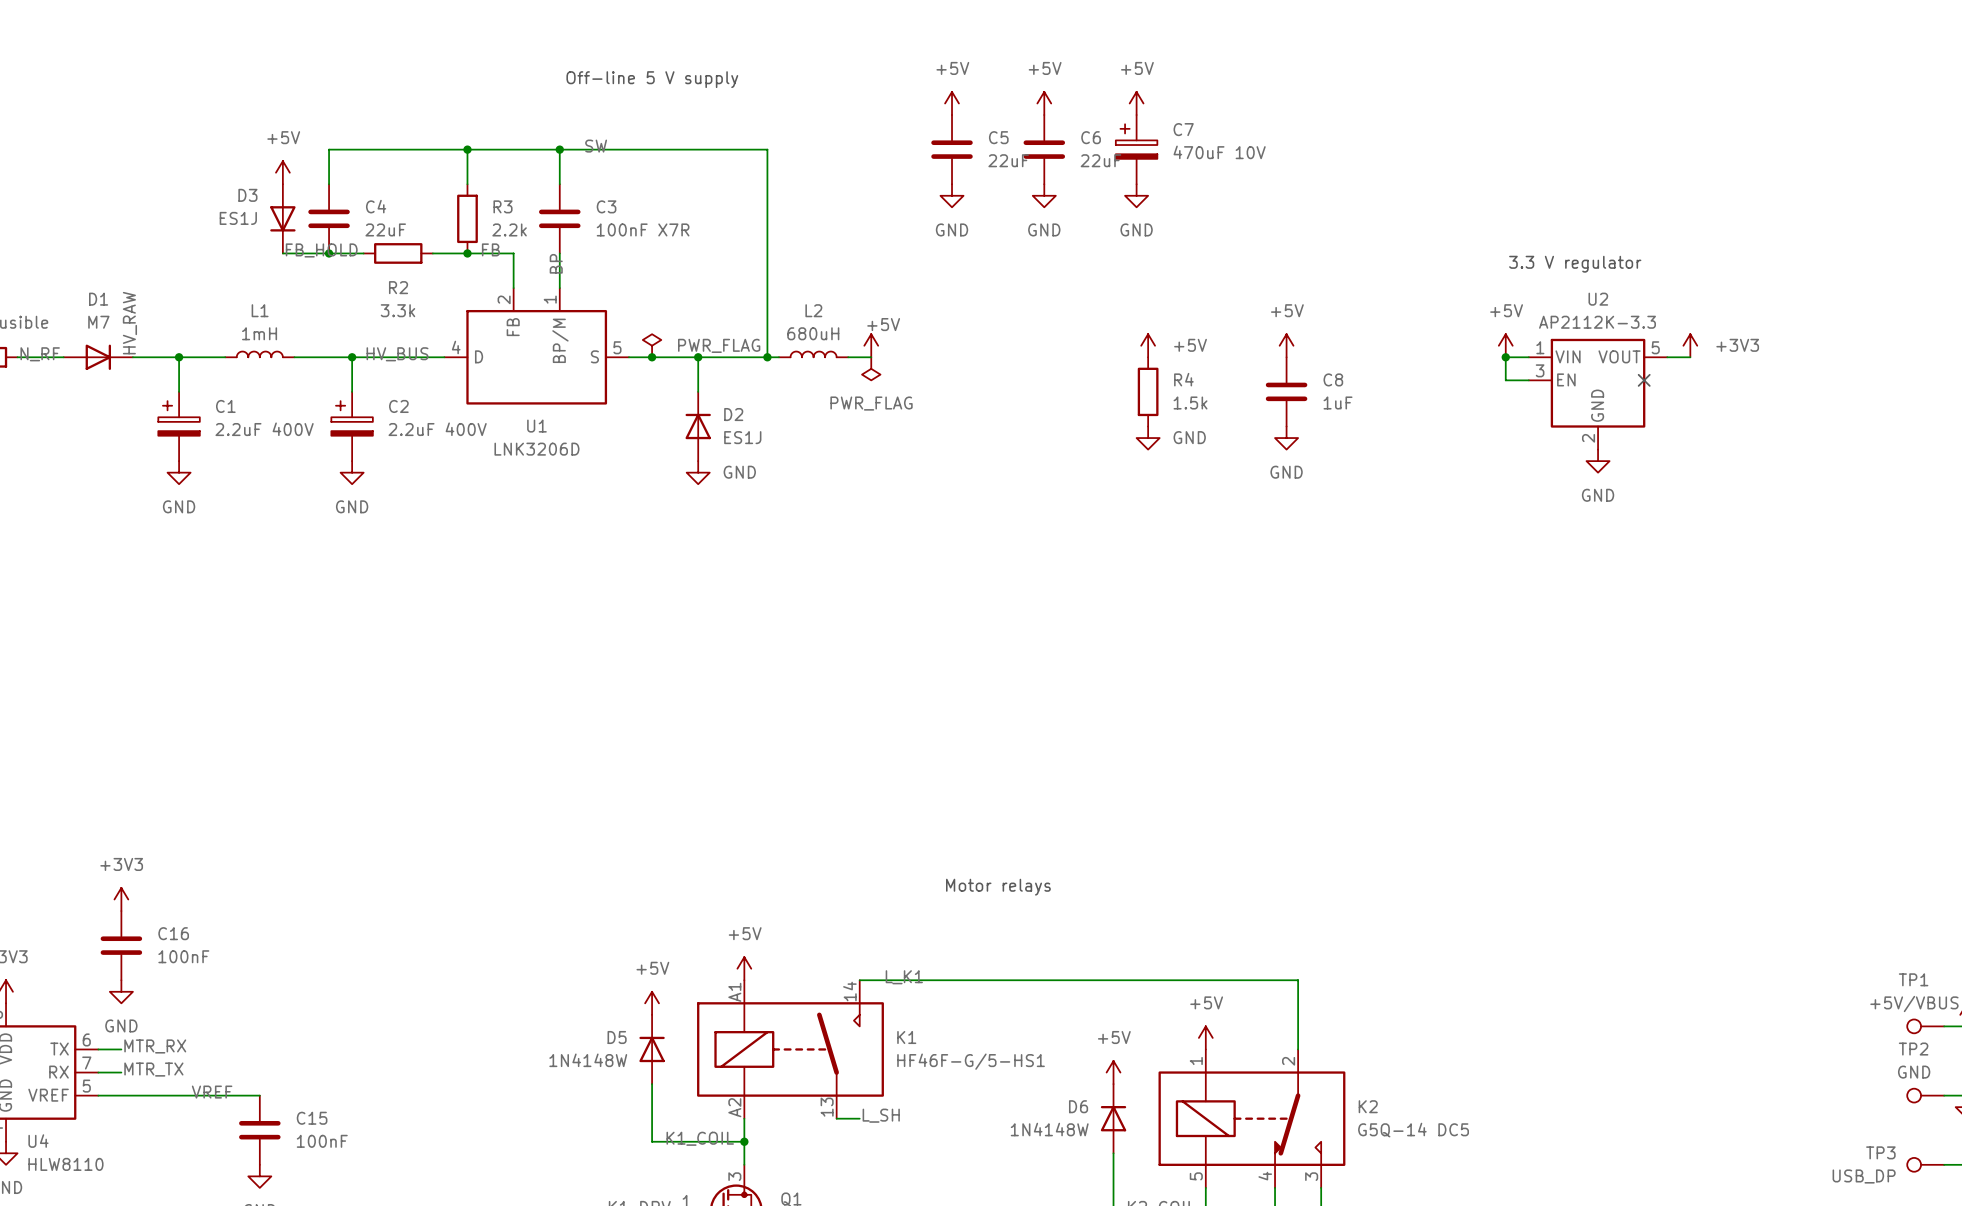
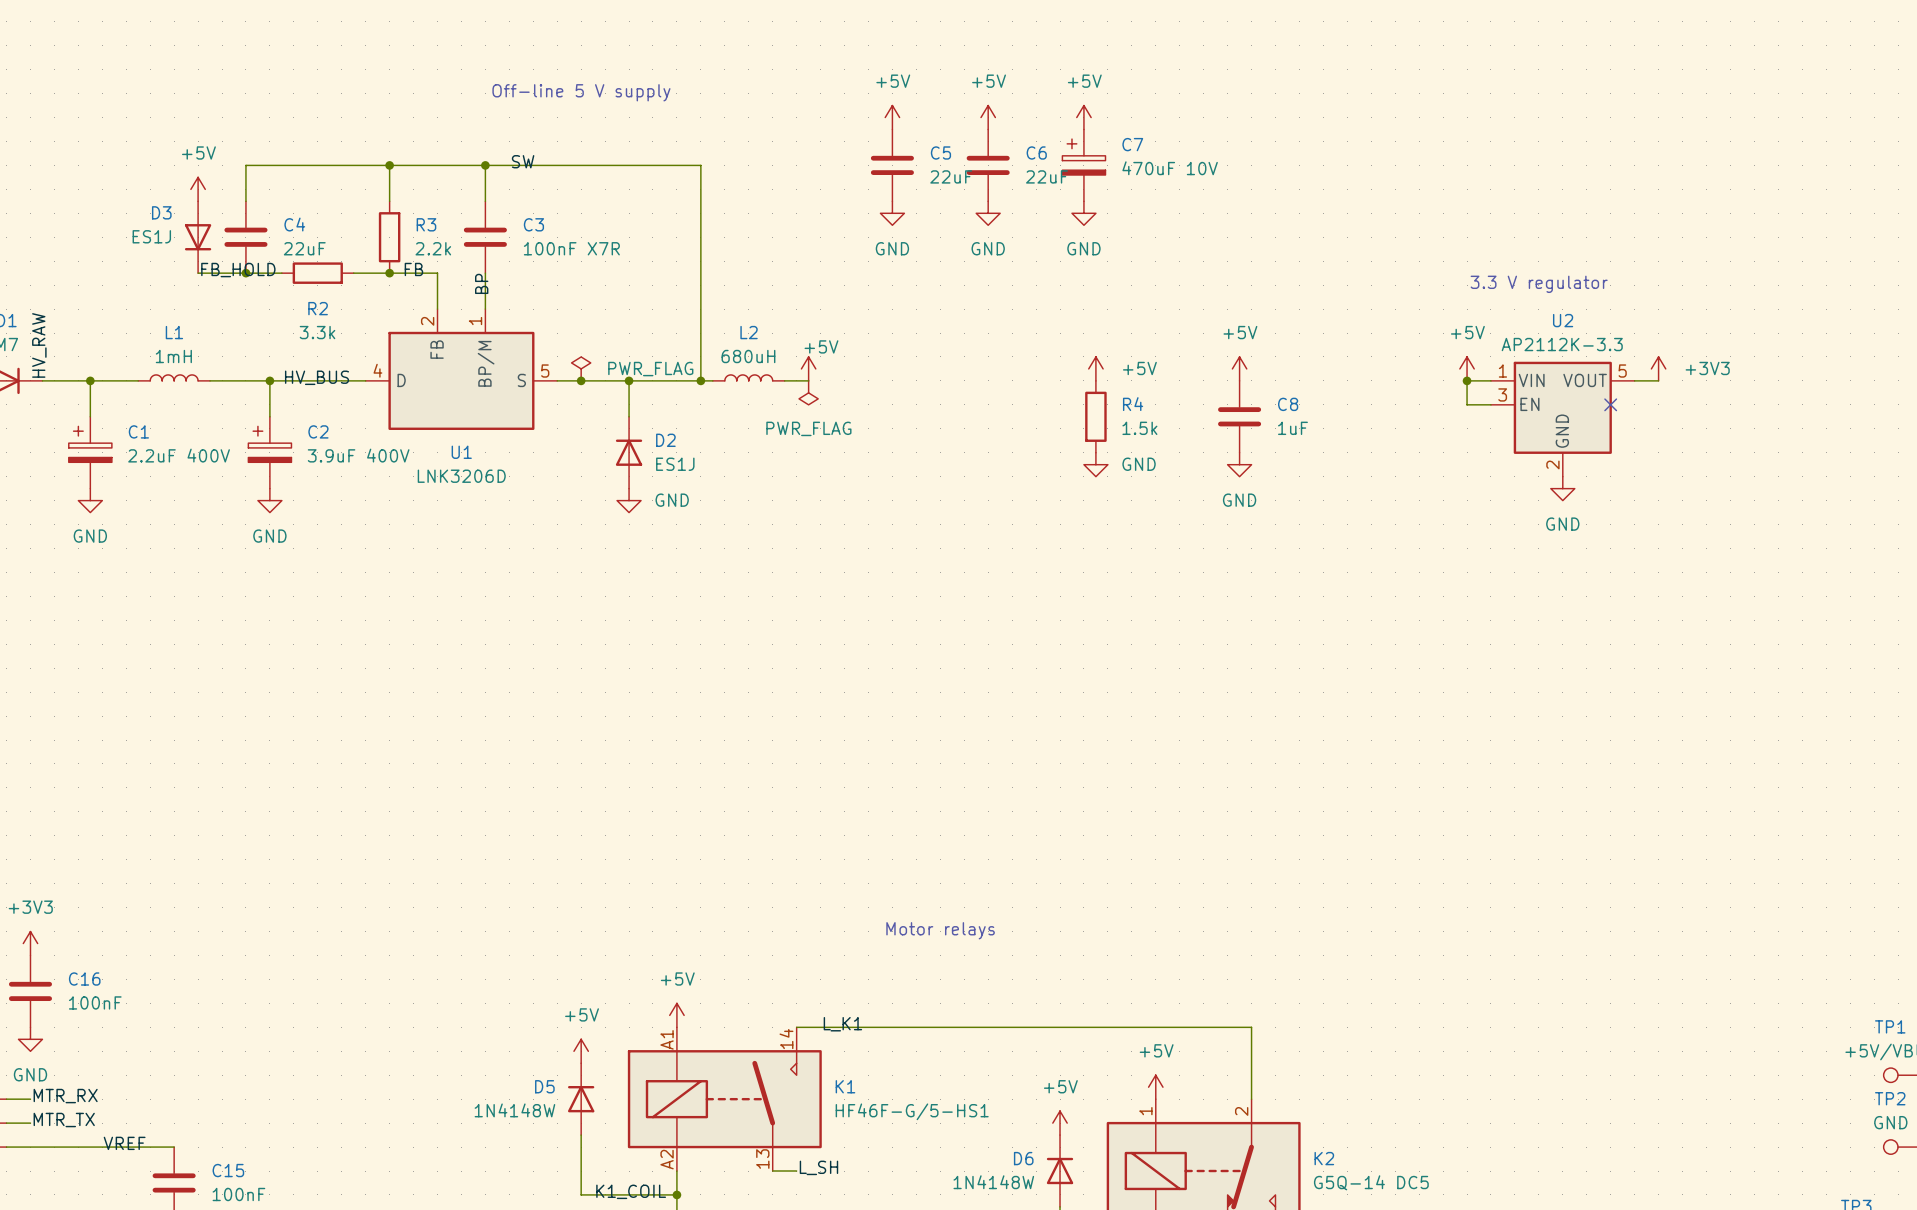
C2 value: 2.2uF 400V (437, 429) -> 3.9uF 400V (358, 455)

